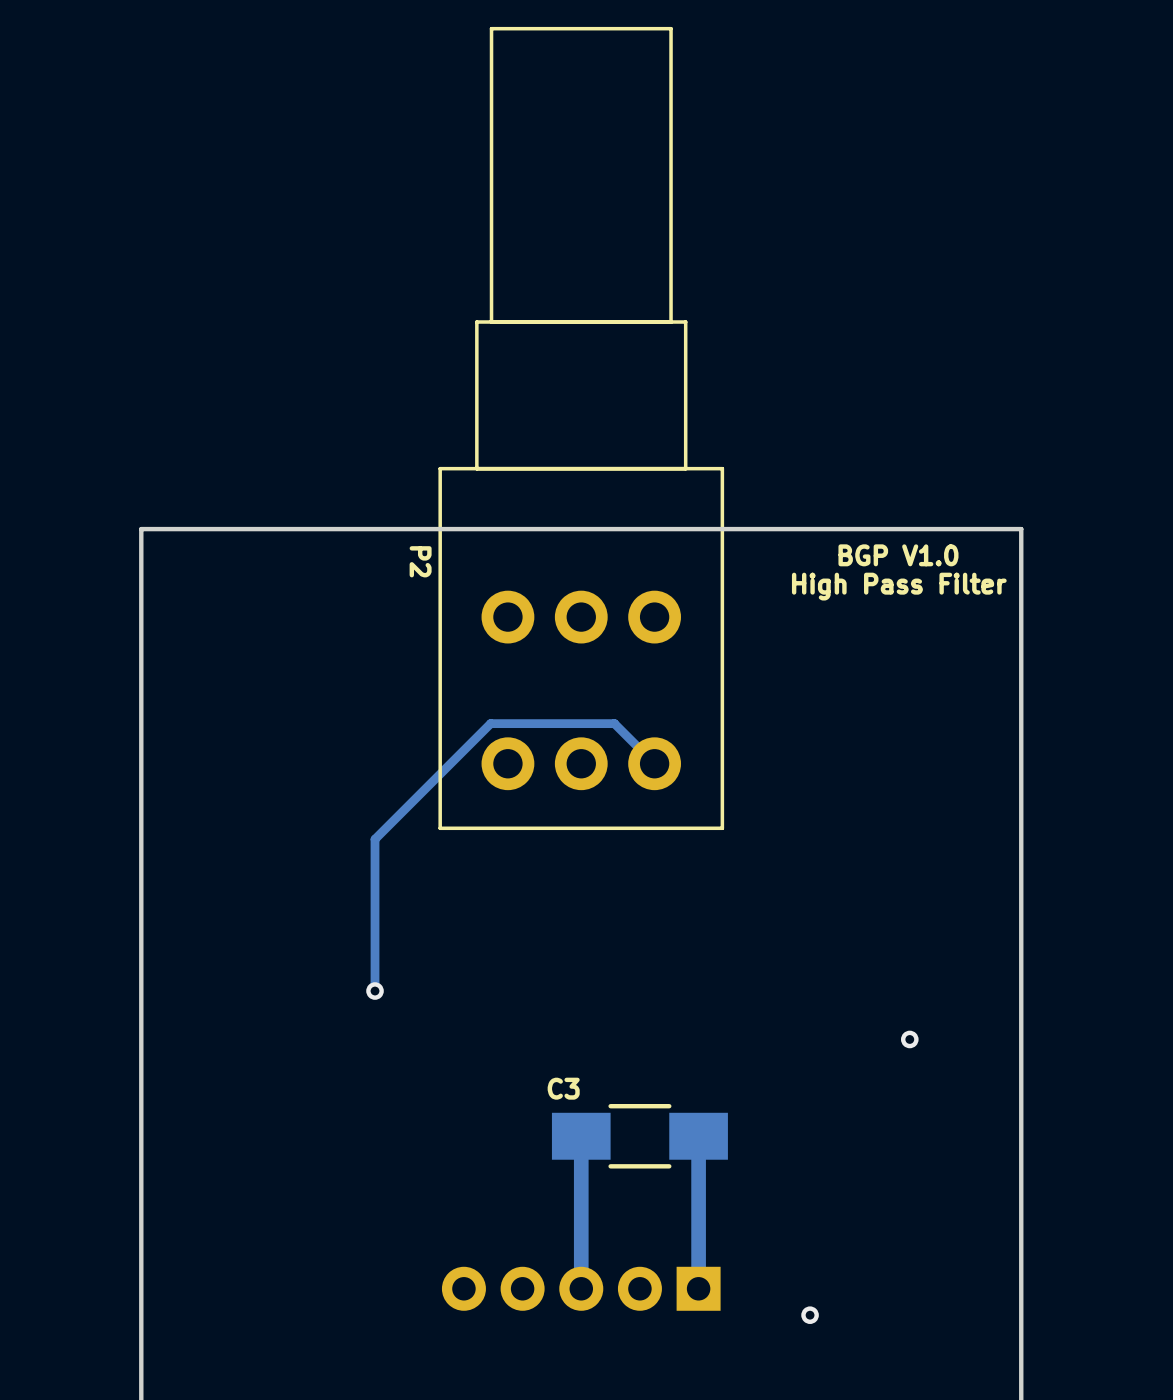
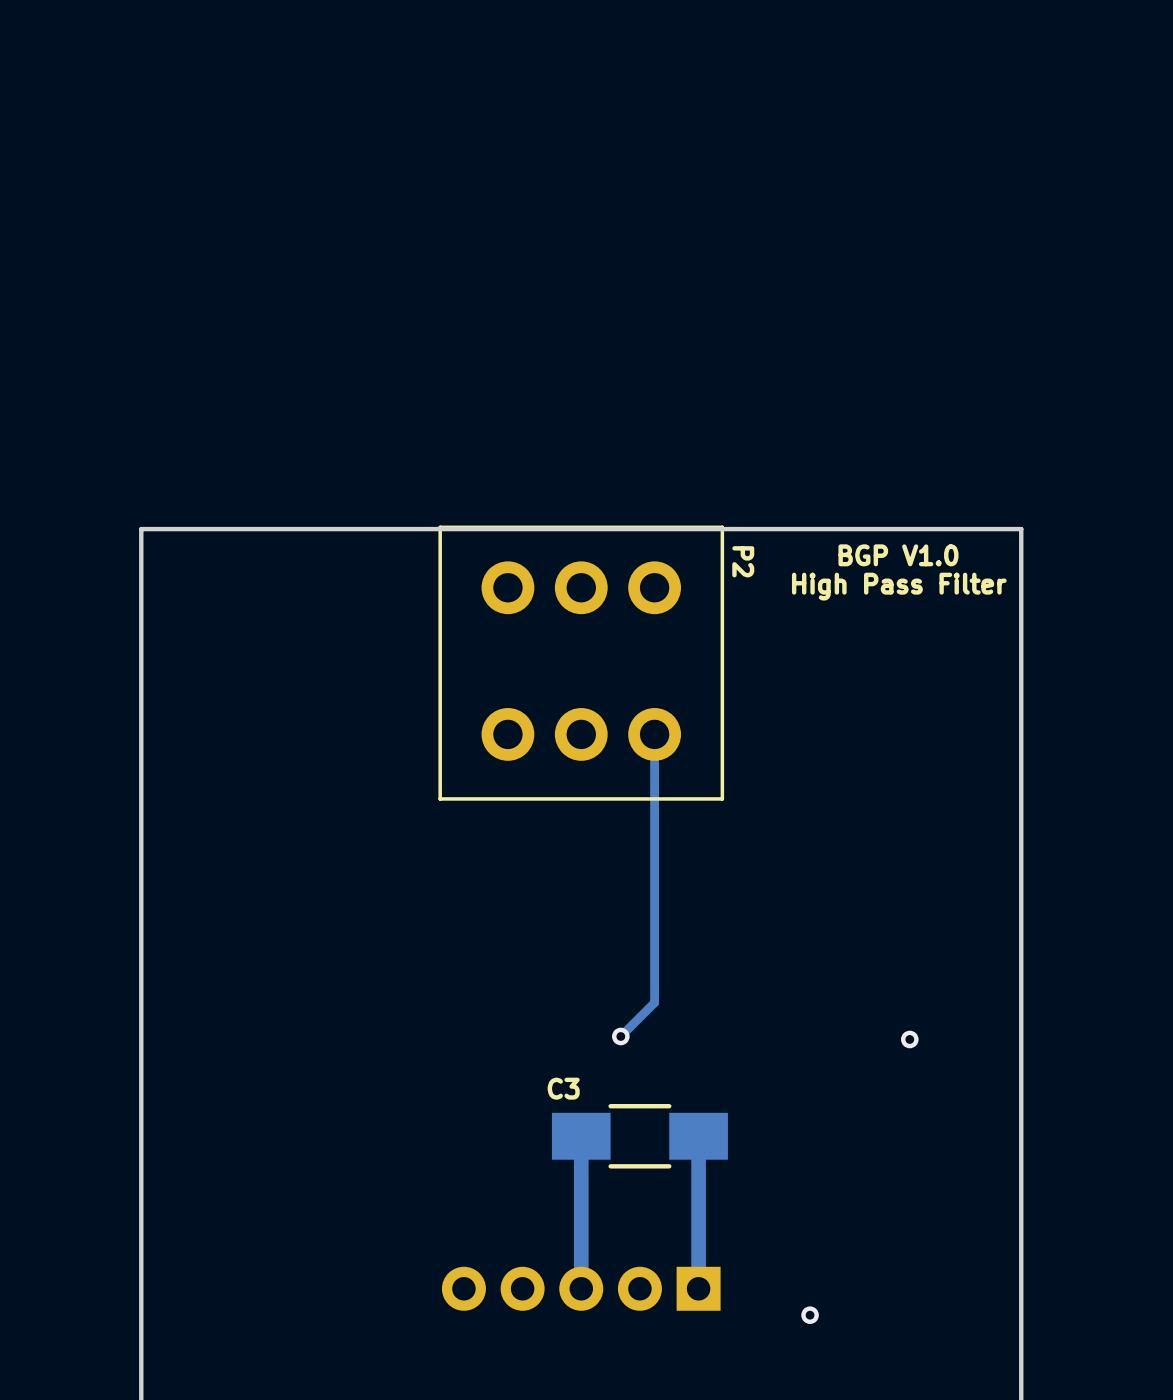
P2 footprint: [438, 26, 725, 831] -> [438, 525, 725, 801]
P2 name position: P2 (420, 561) -> P2 (743, 561)
track: none -> (654, 734) (654, 1002) (620, 1036)
track: (654, 763) (614, 723) (490, 723) (375, 839) (375, 991) -> none
via: (375, 991) -> none
via: none -> (620, 1036)

